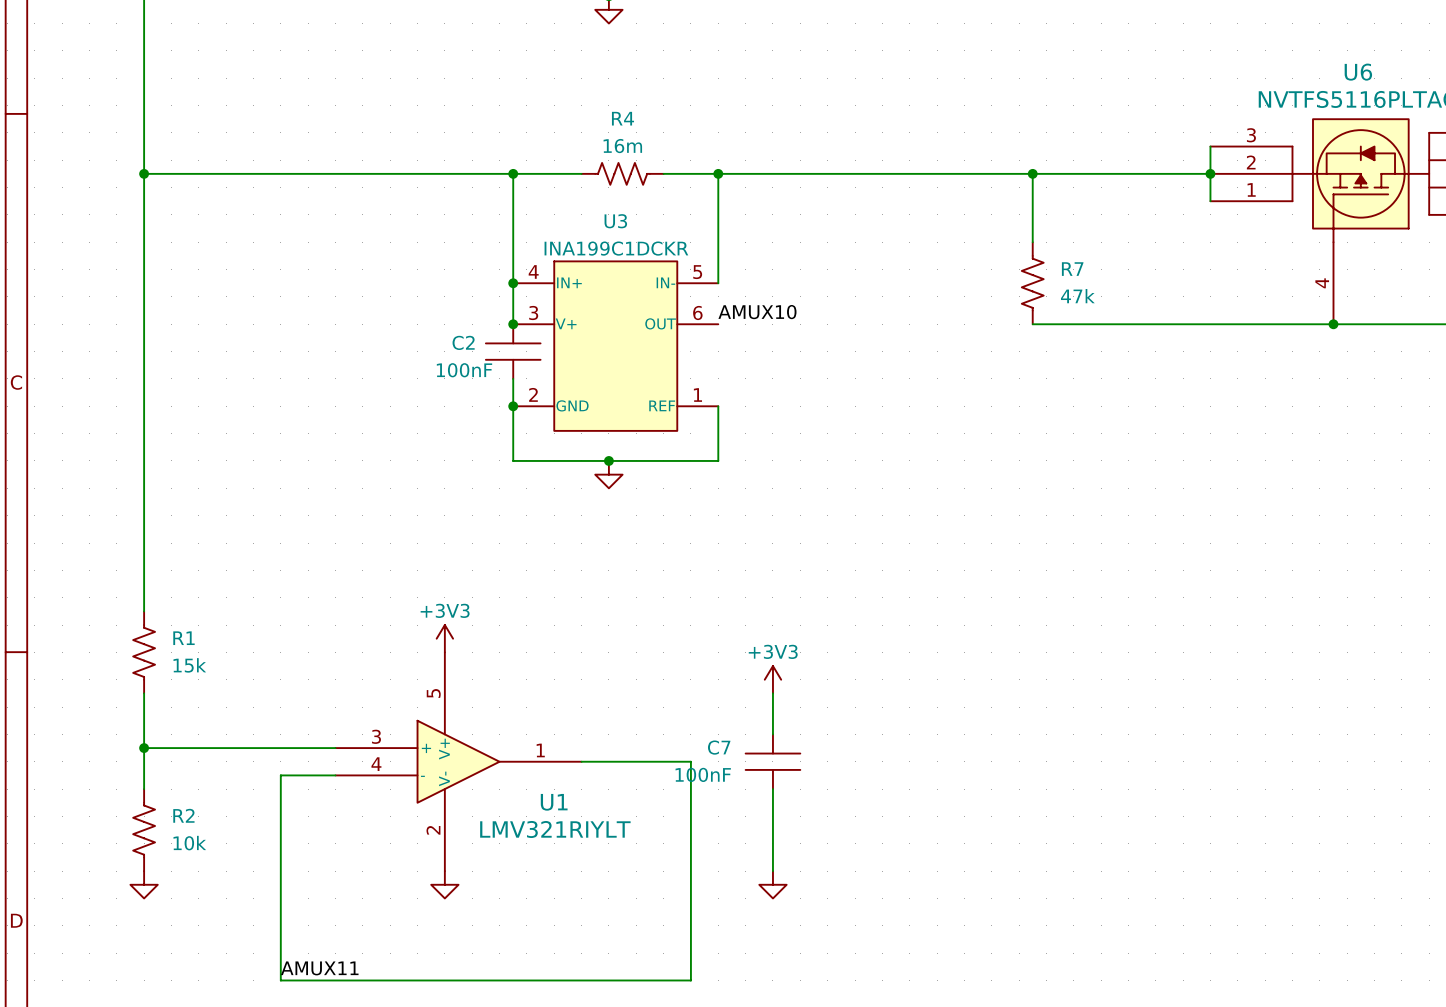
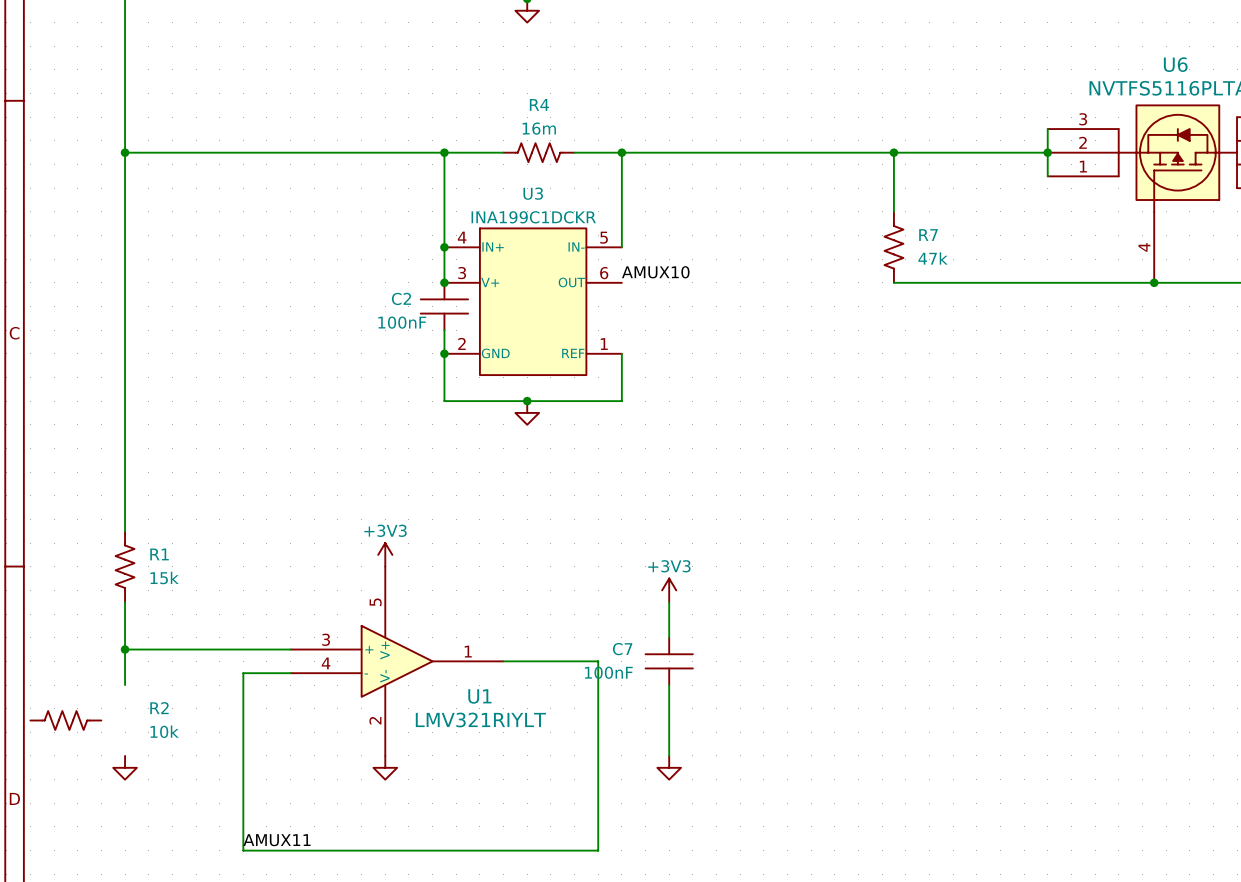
R2 rotation: 0° (144, 830) -> 90° clockwise (65, 720)
R2 position: (144, 830) -> (65, 720)

